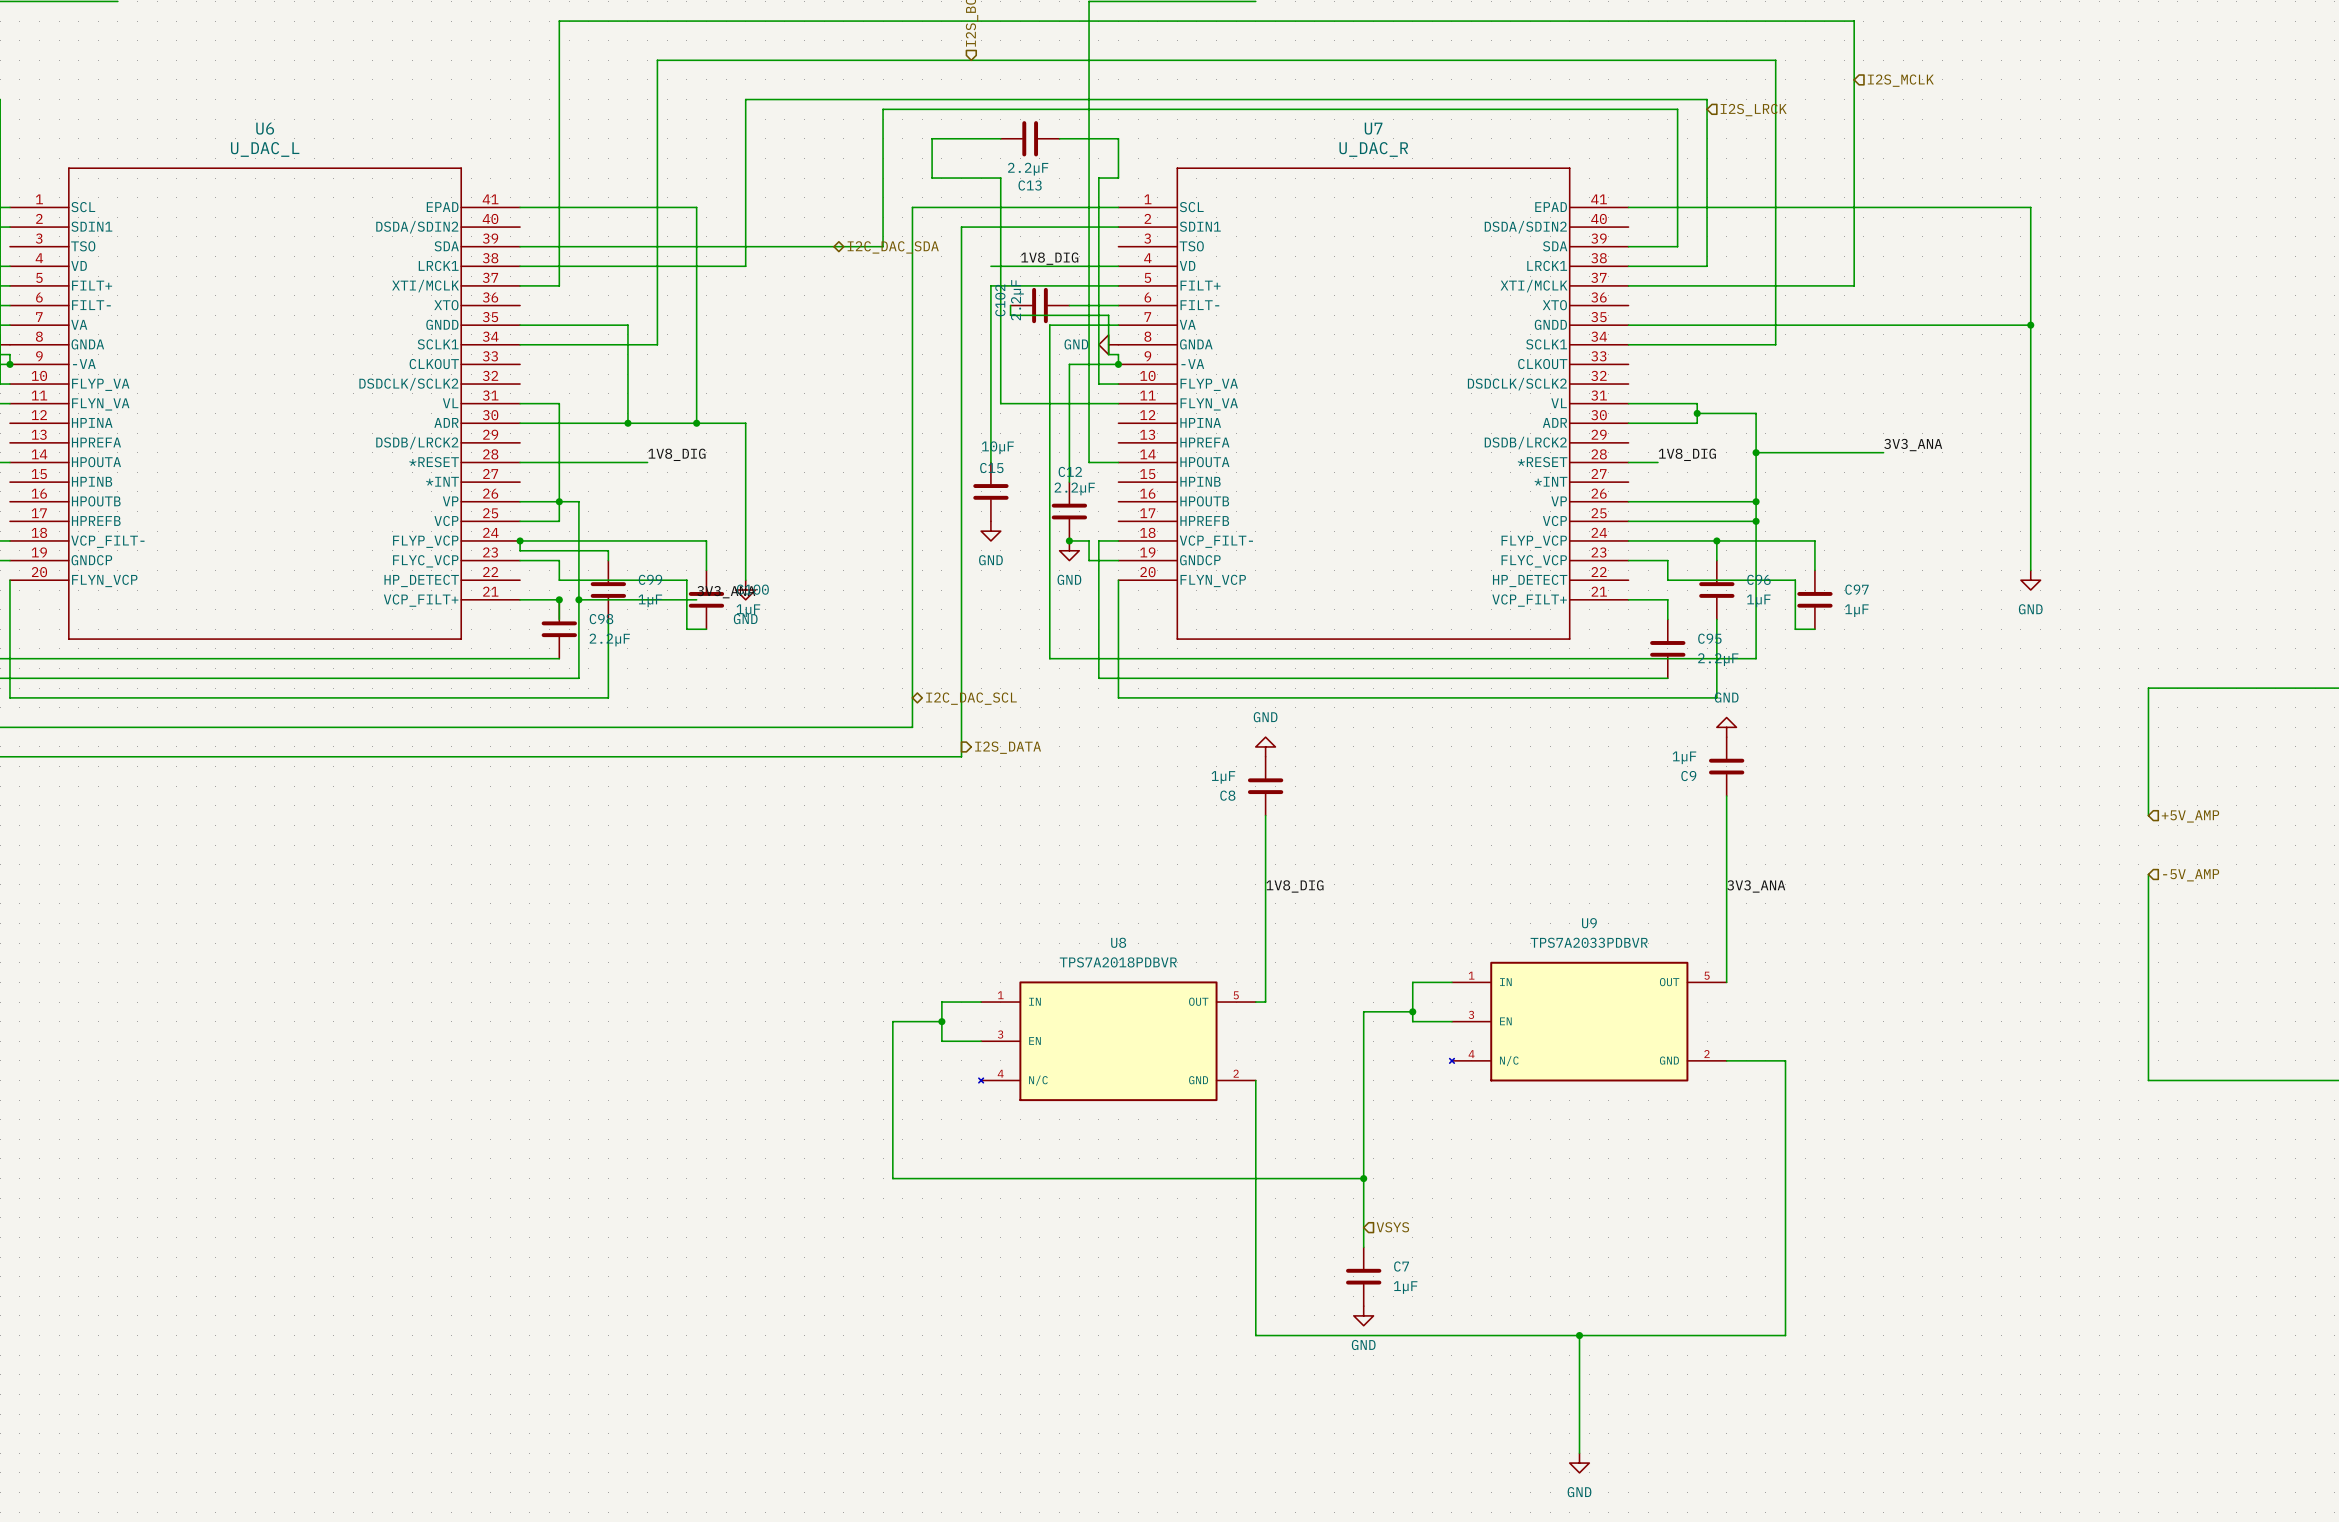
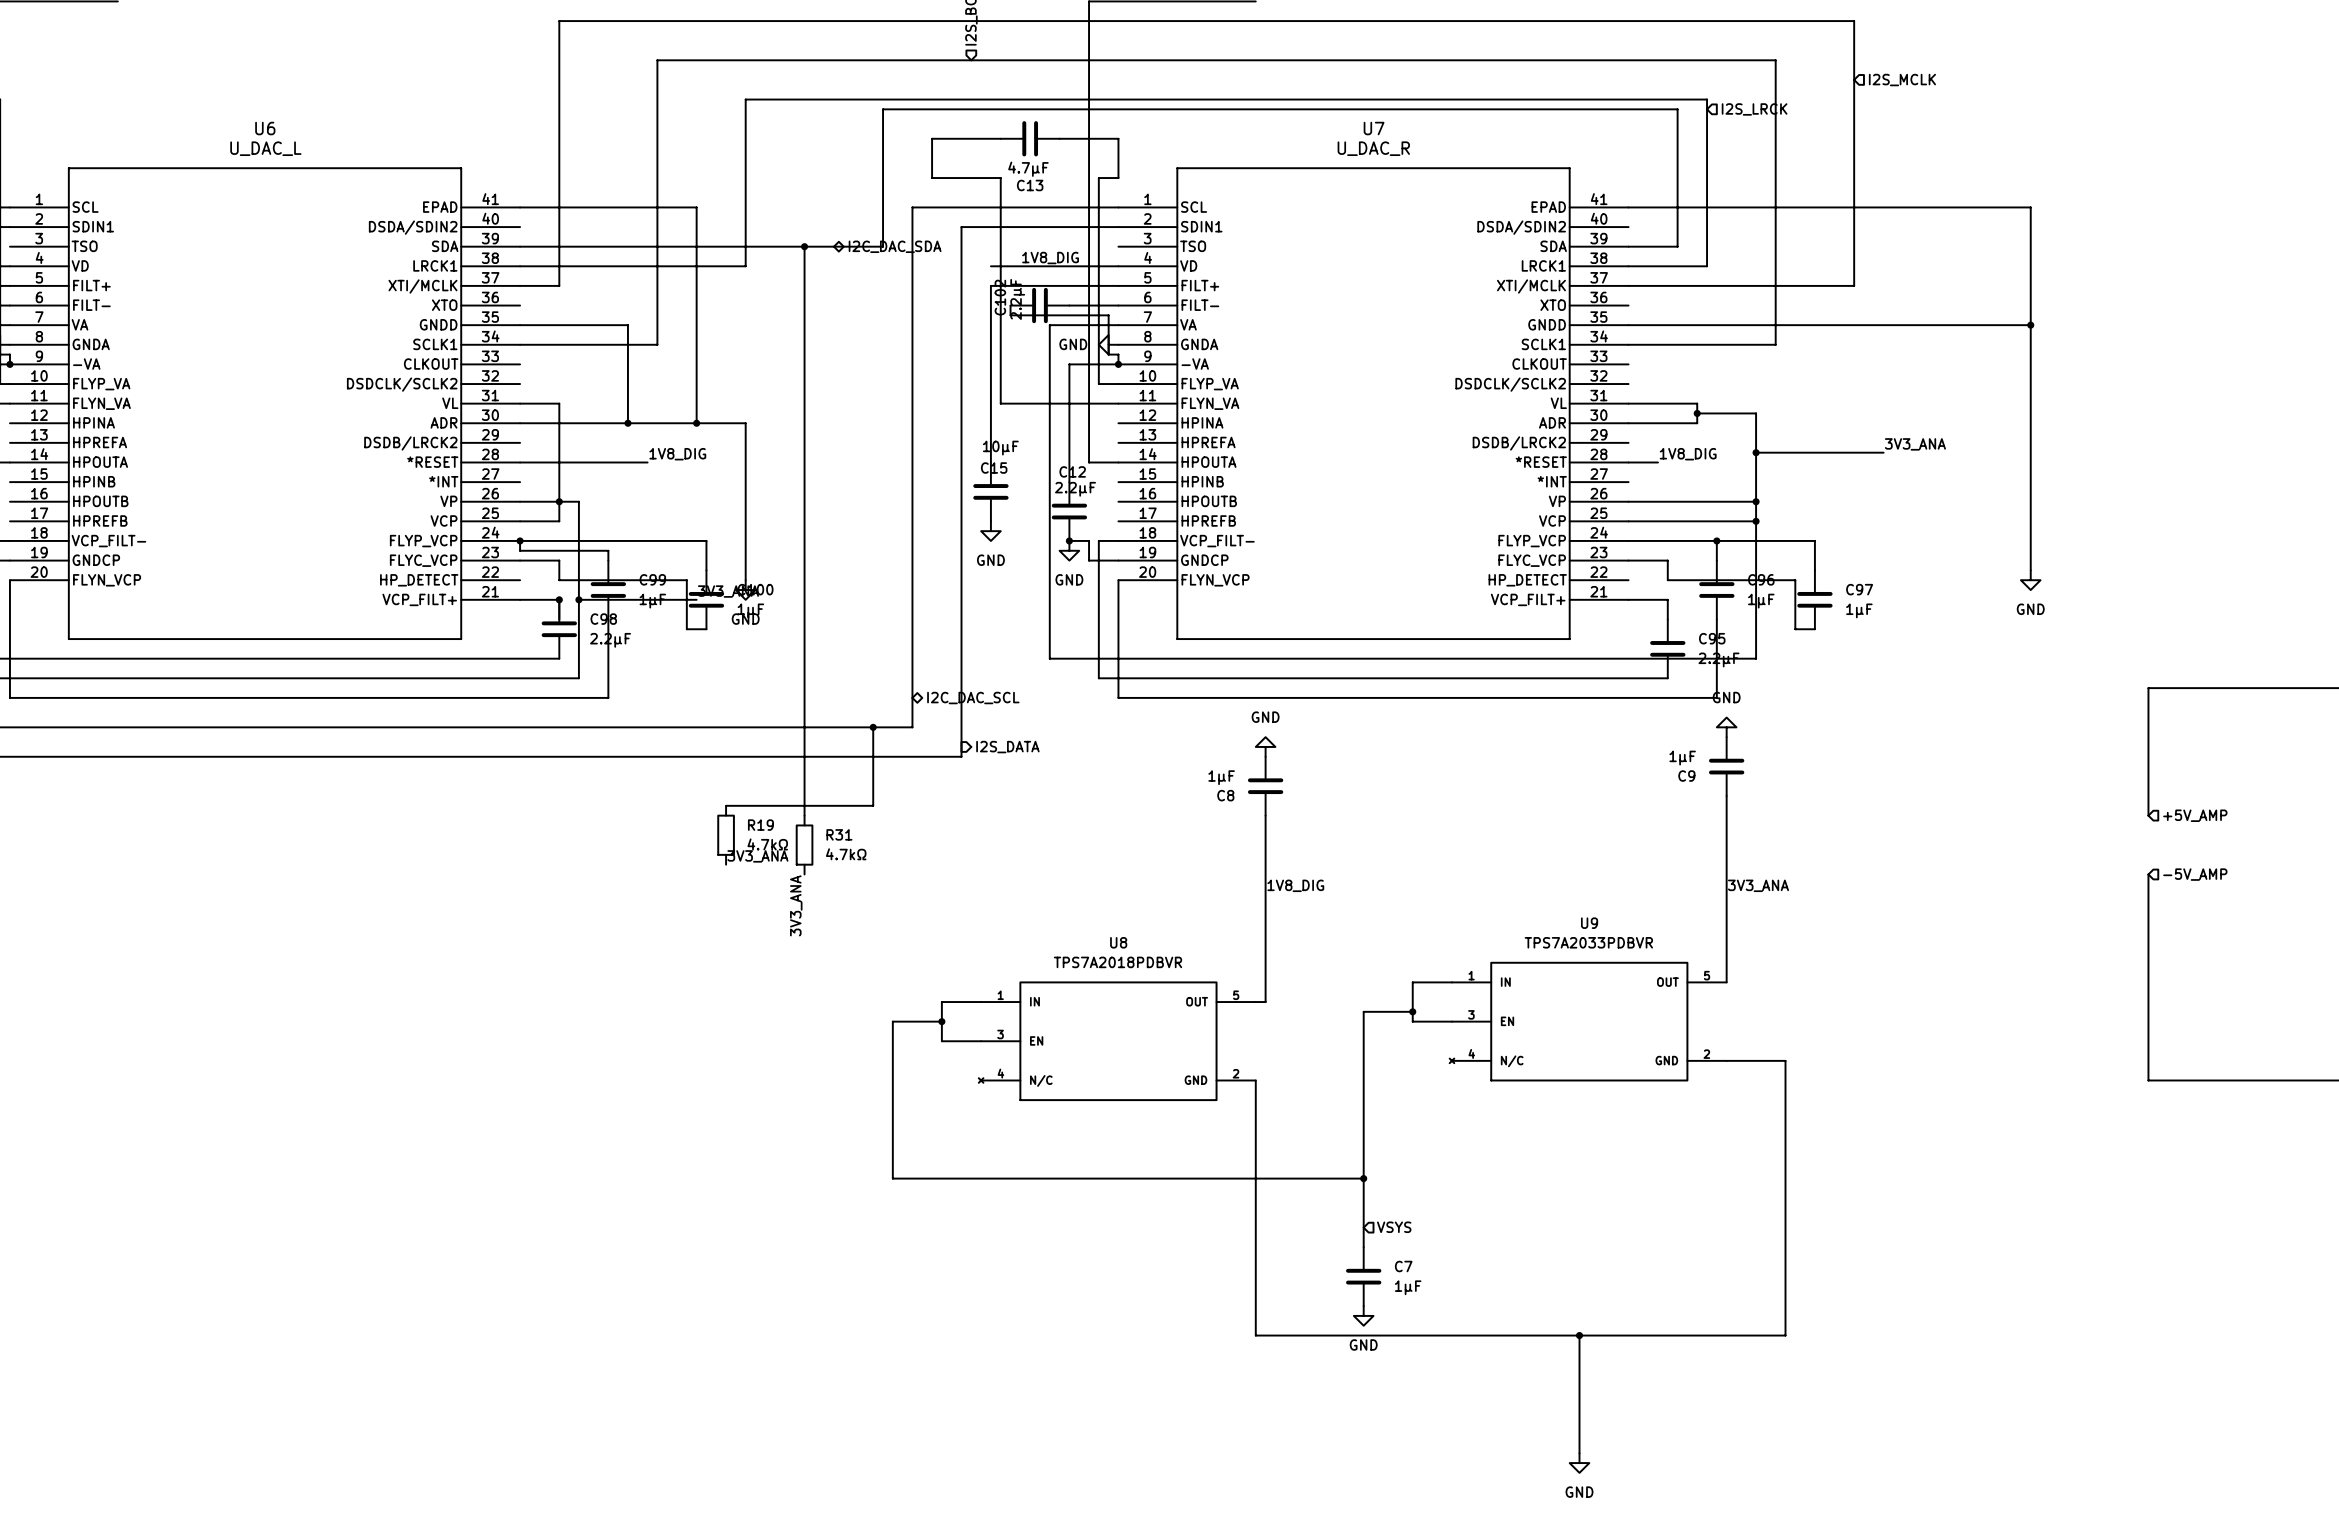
C13 value: 2.2µF (1028, 169) -> 4.7µF (1028, 169)
wire: none -> (804, 246) (804, 815)
junction: none -> (804, 246)
wire: none -> (873, 727) (873, 805) (726, 805)
junction: none -> (873, 727)
R19: none -> 4.7kΩ (726, 835)
R31: none -> 4.7kΩ (804, 845)
label: none -> 3V3_ANA (757, 856)
label: none -> 3V3_ANA (796, 905)

